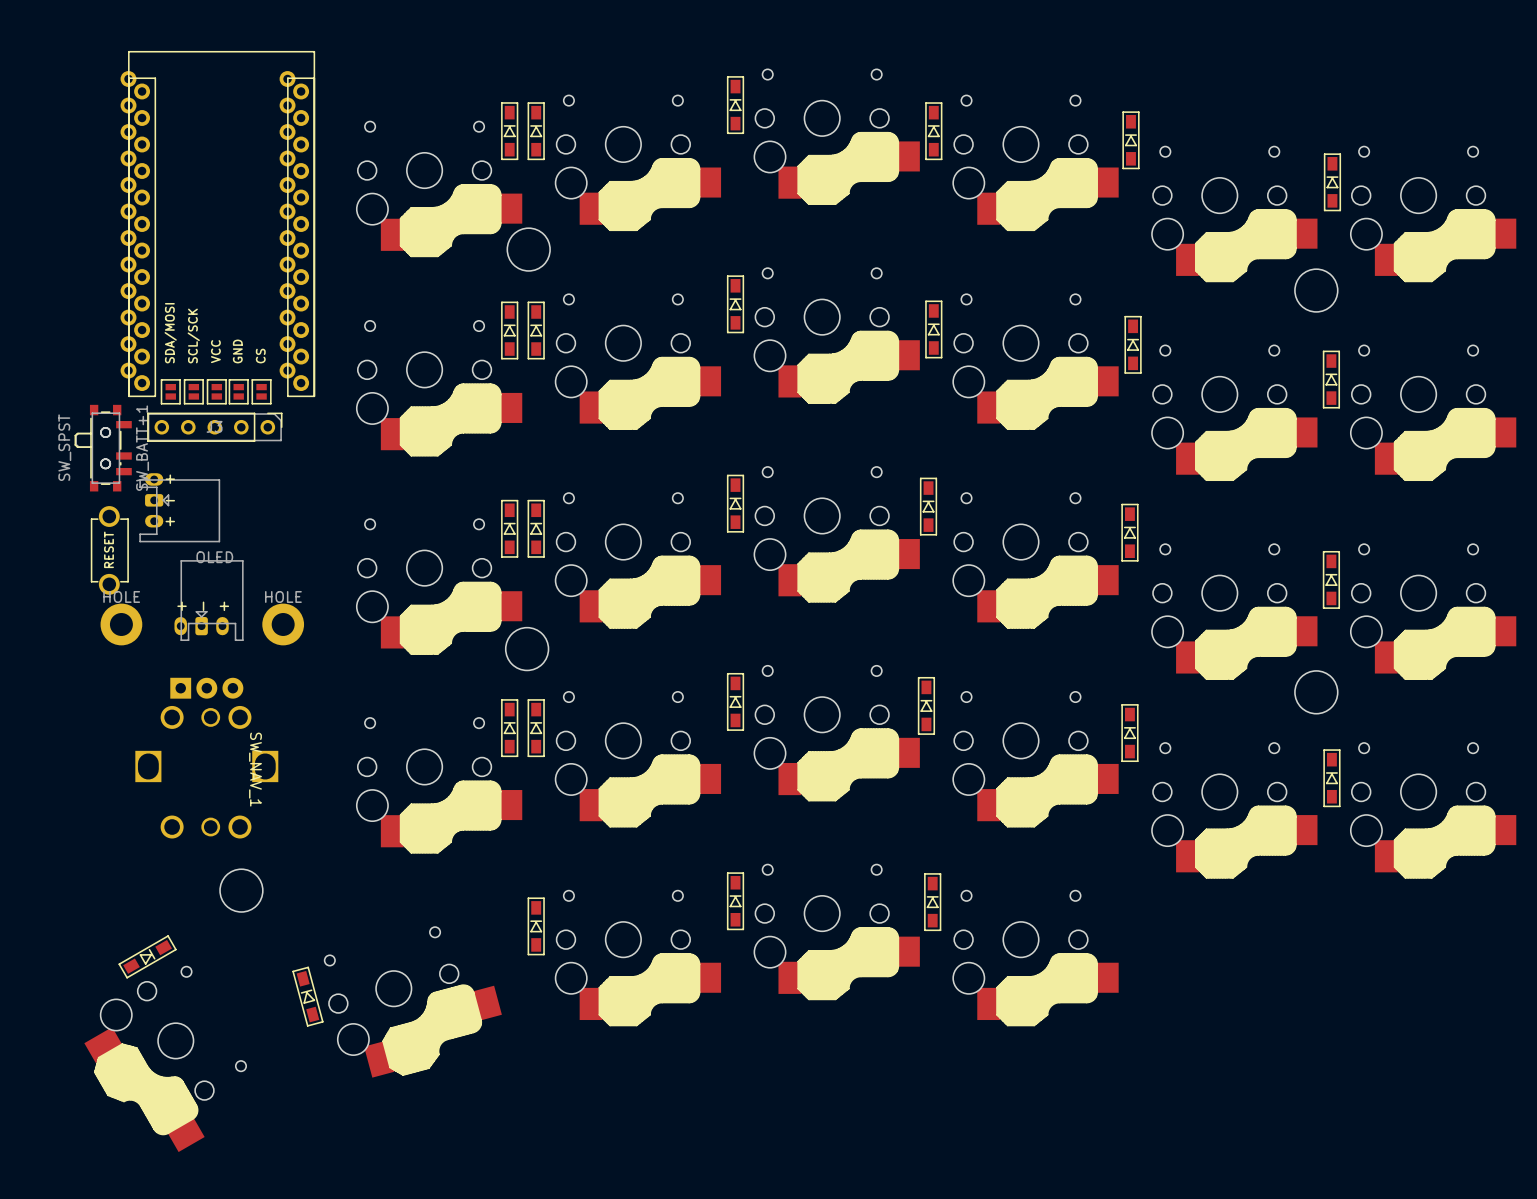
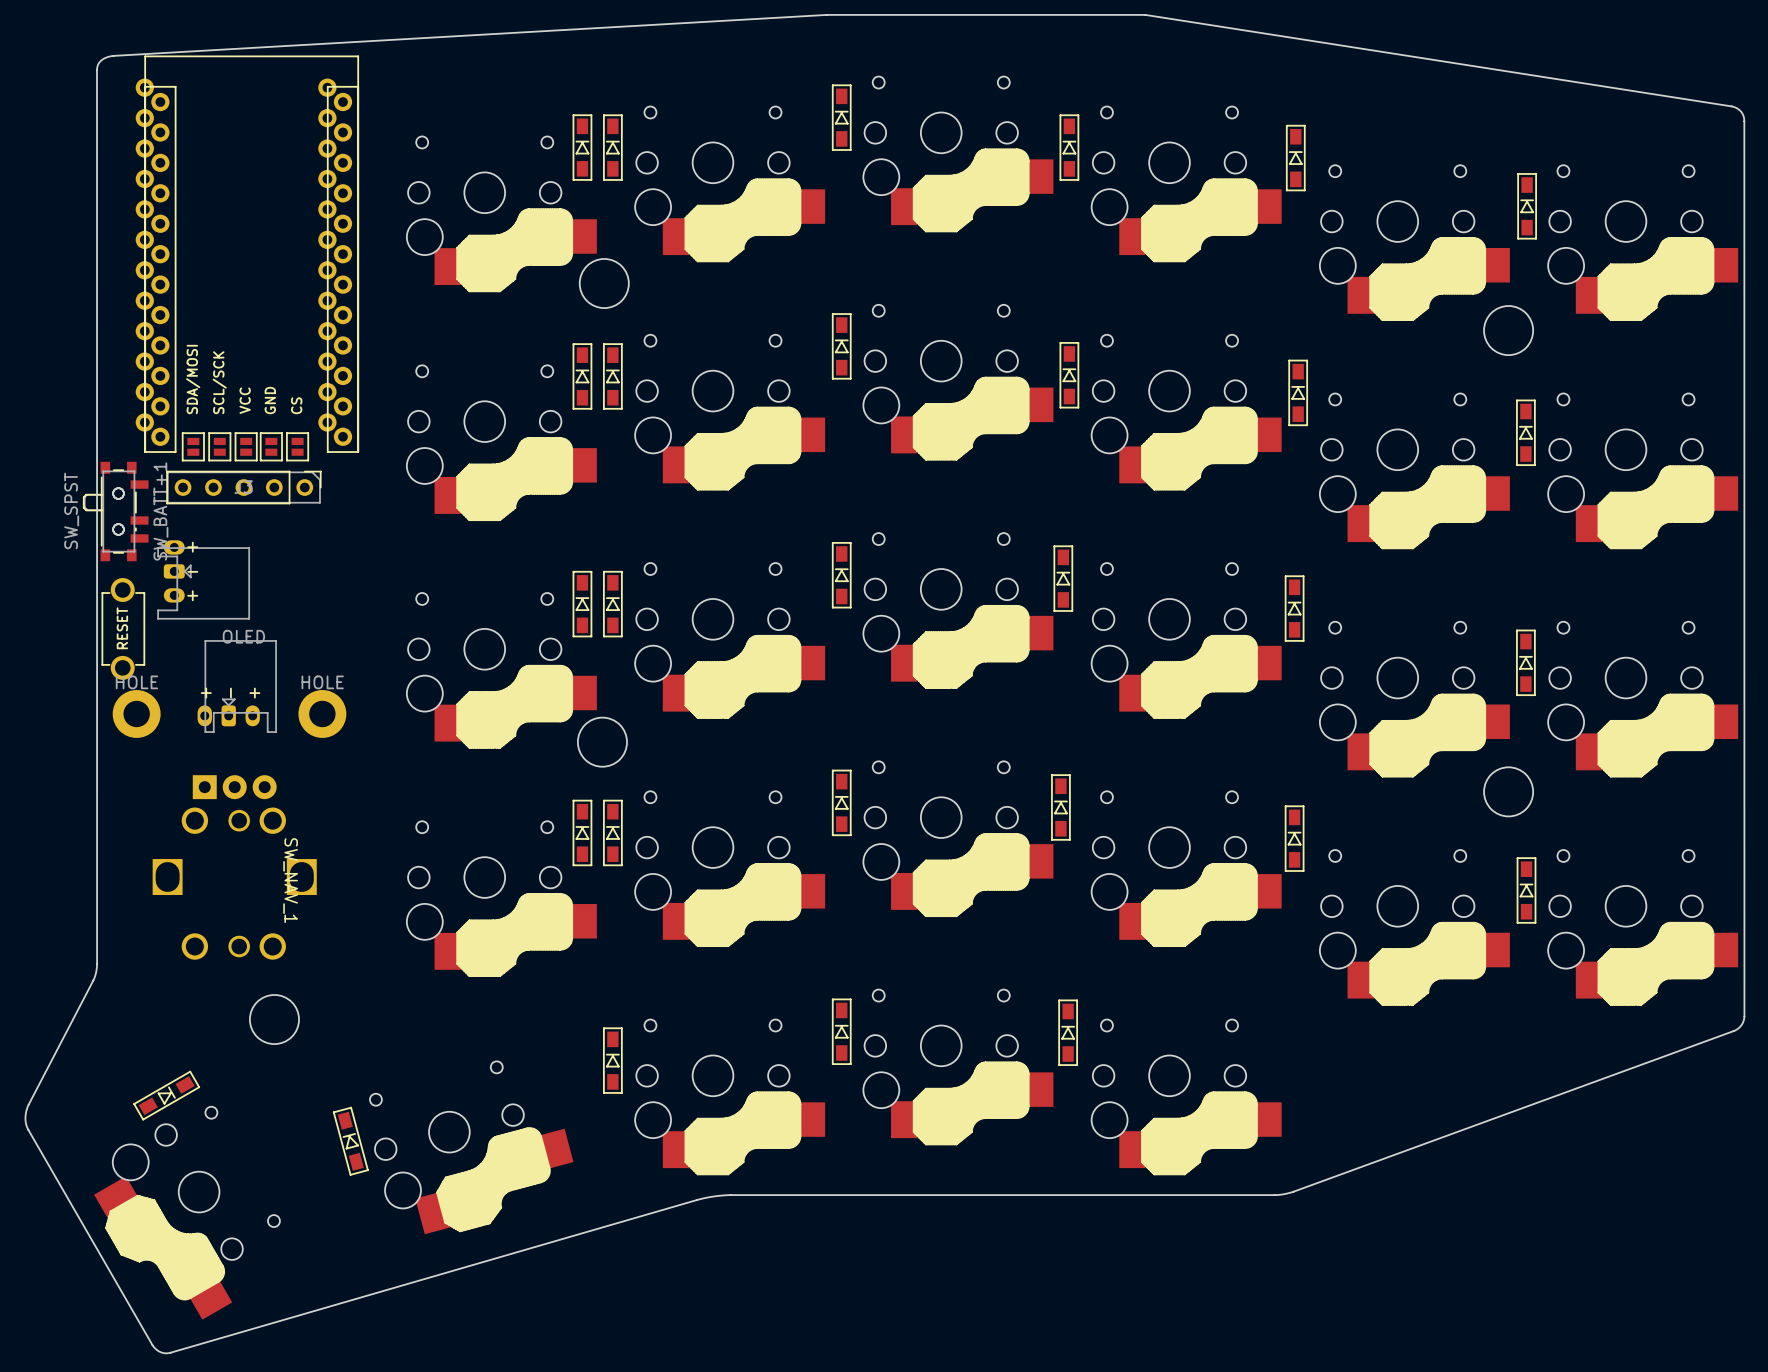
board edge: none -> (826, 14) (113, 55) (103, 58) (98, 63) (97, 70) (96, 966) (93, 980) (28, 1105) (25, 1118) (28, 1130) (152, 1345) (159, 1351) (170, 1352) (715, 1196) (1284, 1194) (1733, 1031) (1742, 1023) (1744, 1016) (1744, 121) (1740, 110) (1731, 106) (1145, 14) (826, 14)

